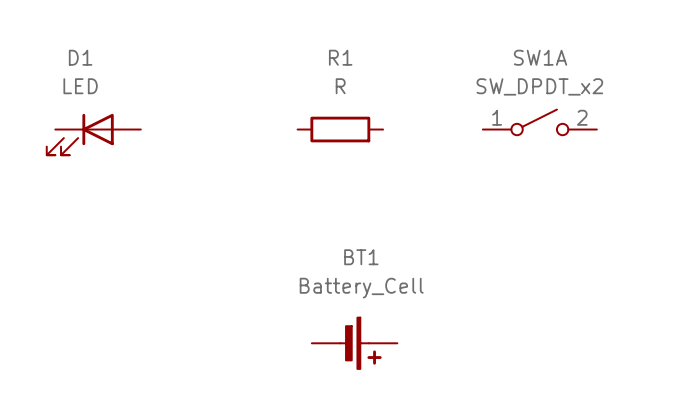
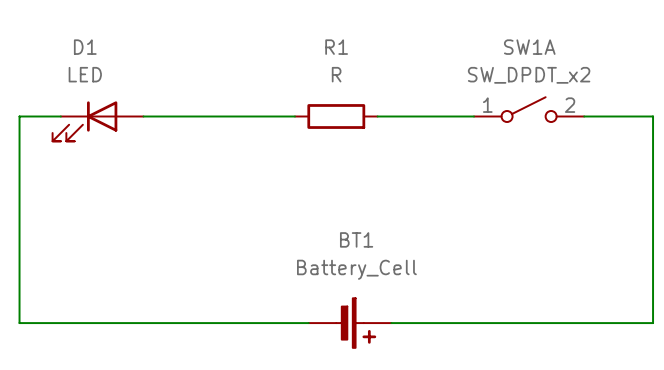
wire: none -> (60, 116) (19, 116) (19, 323) (308, 323)
wire: none -> (143, 116) (294, 116)
wire: none -> (377, 116) (474, 116)
wire: none -> (584, 116) (653, 116) (653, 323) (391, 323)

